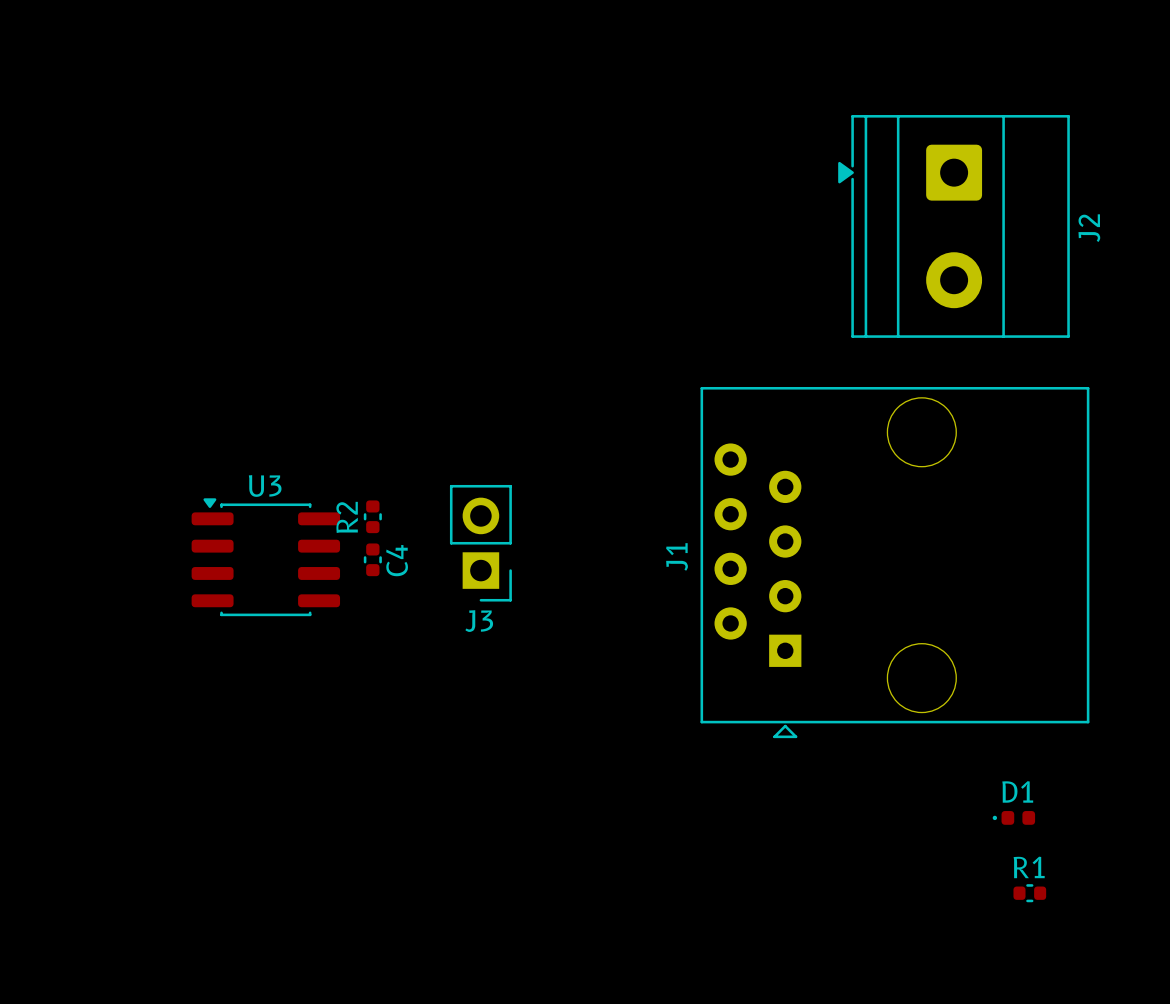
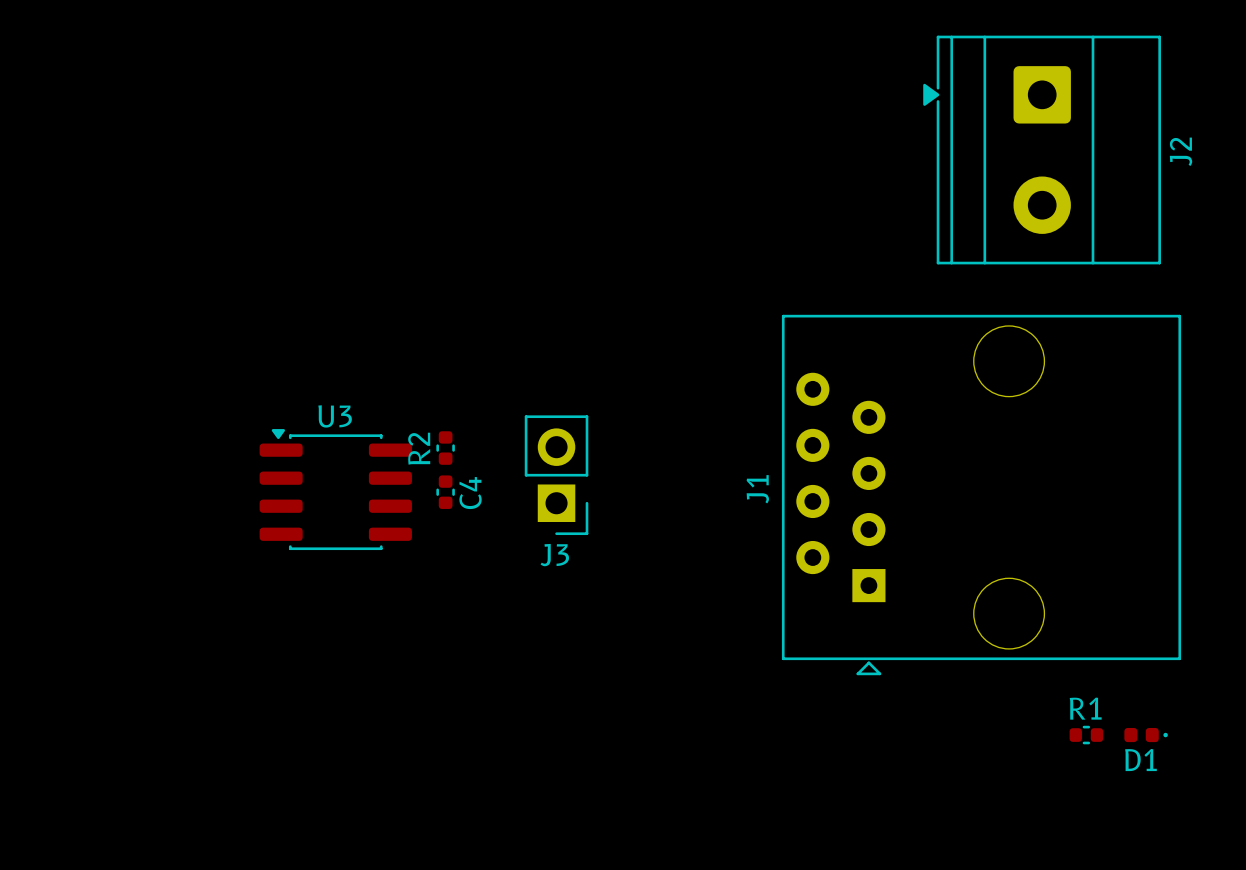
D1 rotation: 0° (1013, 817) -> 180° (1146, 735)
D1 position: (1013, 817) -> (1146, 735)
R1 position: (1029, 893) -> (1086, 735)

